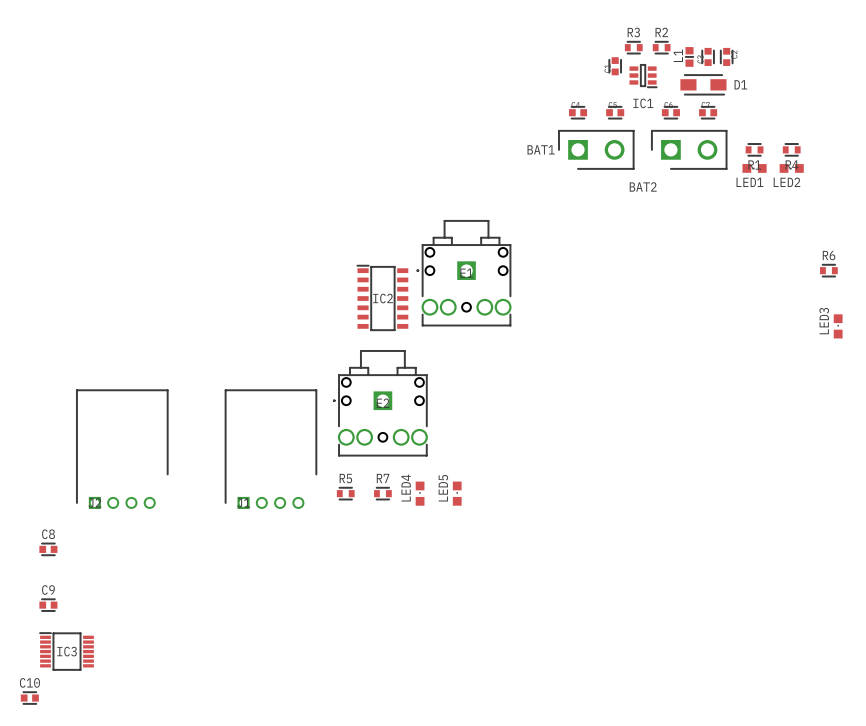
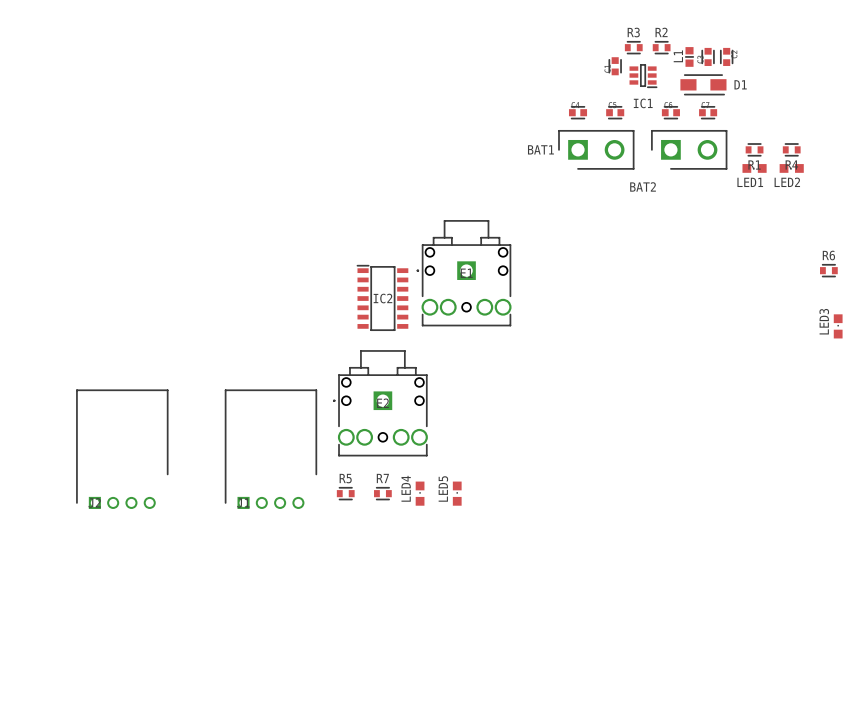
C8: (48, 549) -> none
C9: (48, 605) -> none
IC3: (66, 651) -> none
C10: (29, 698) -> none

